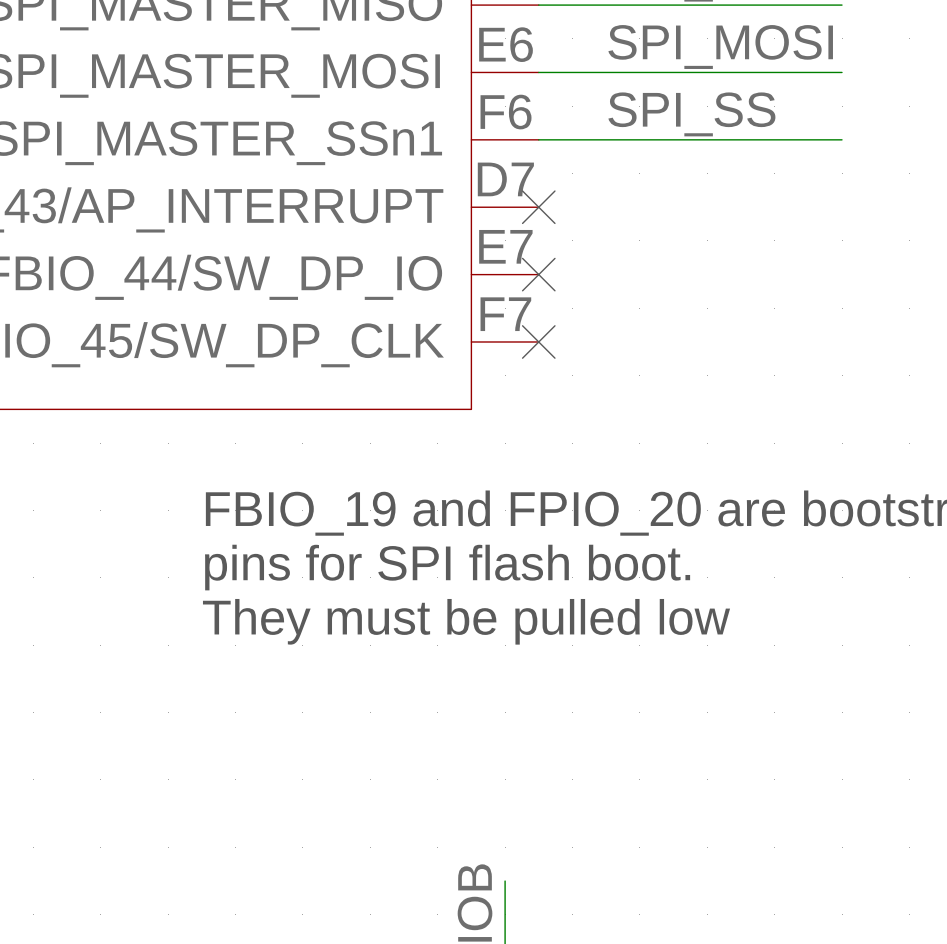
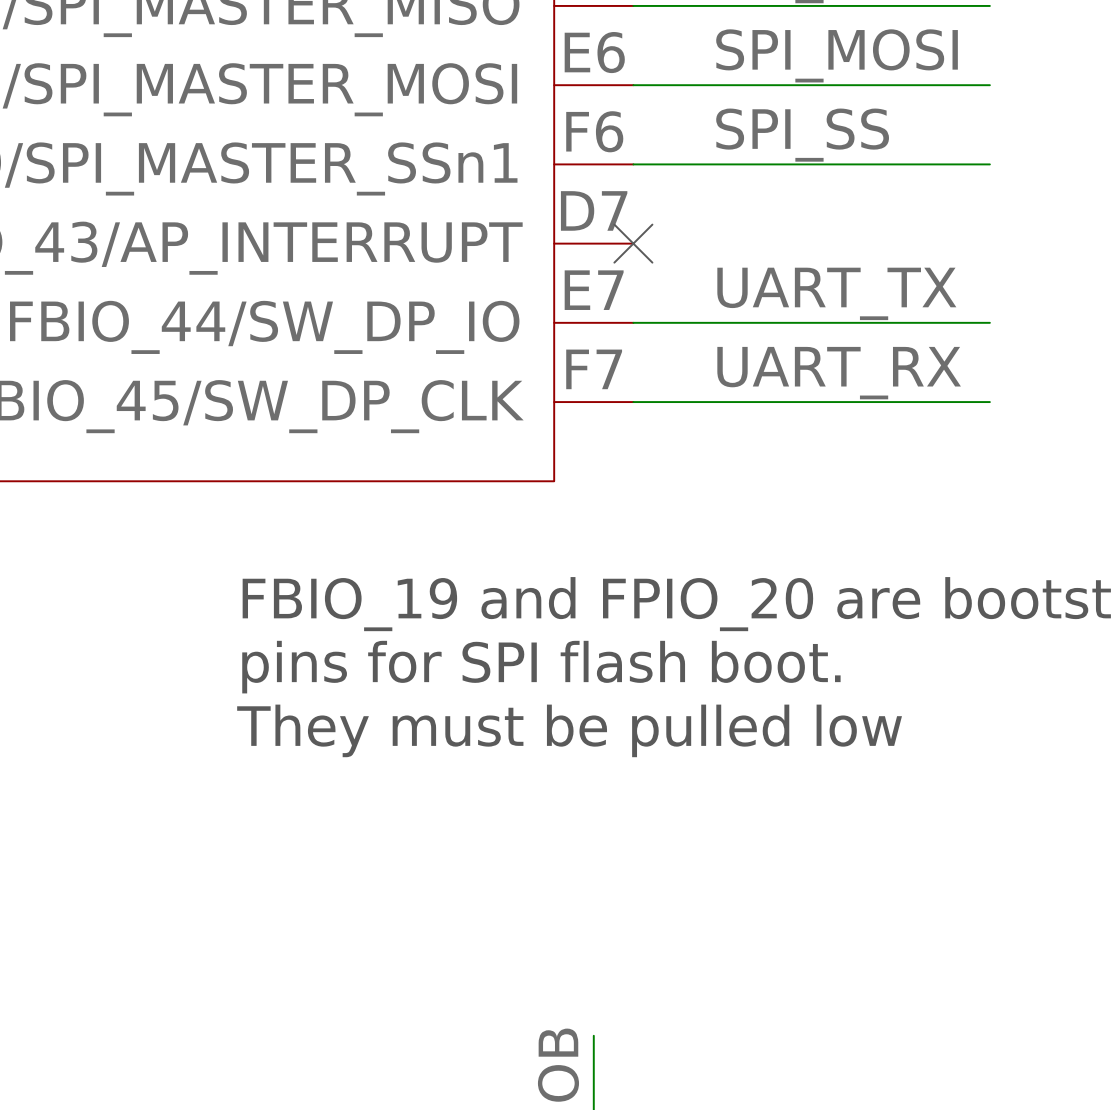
label: none -> UART_TX (836, 293)
wire: none -> (633, 322) (989, 322)
no-connect mark: (538, 274) -> none
label: none -> UART_RX (839, 373)
wire: none -> (633, 402) (989, 402)
no-connect mark: (538, 341) -> none

